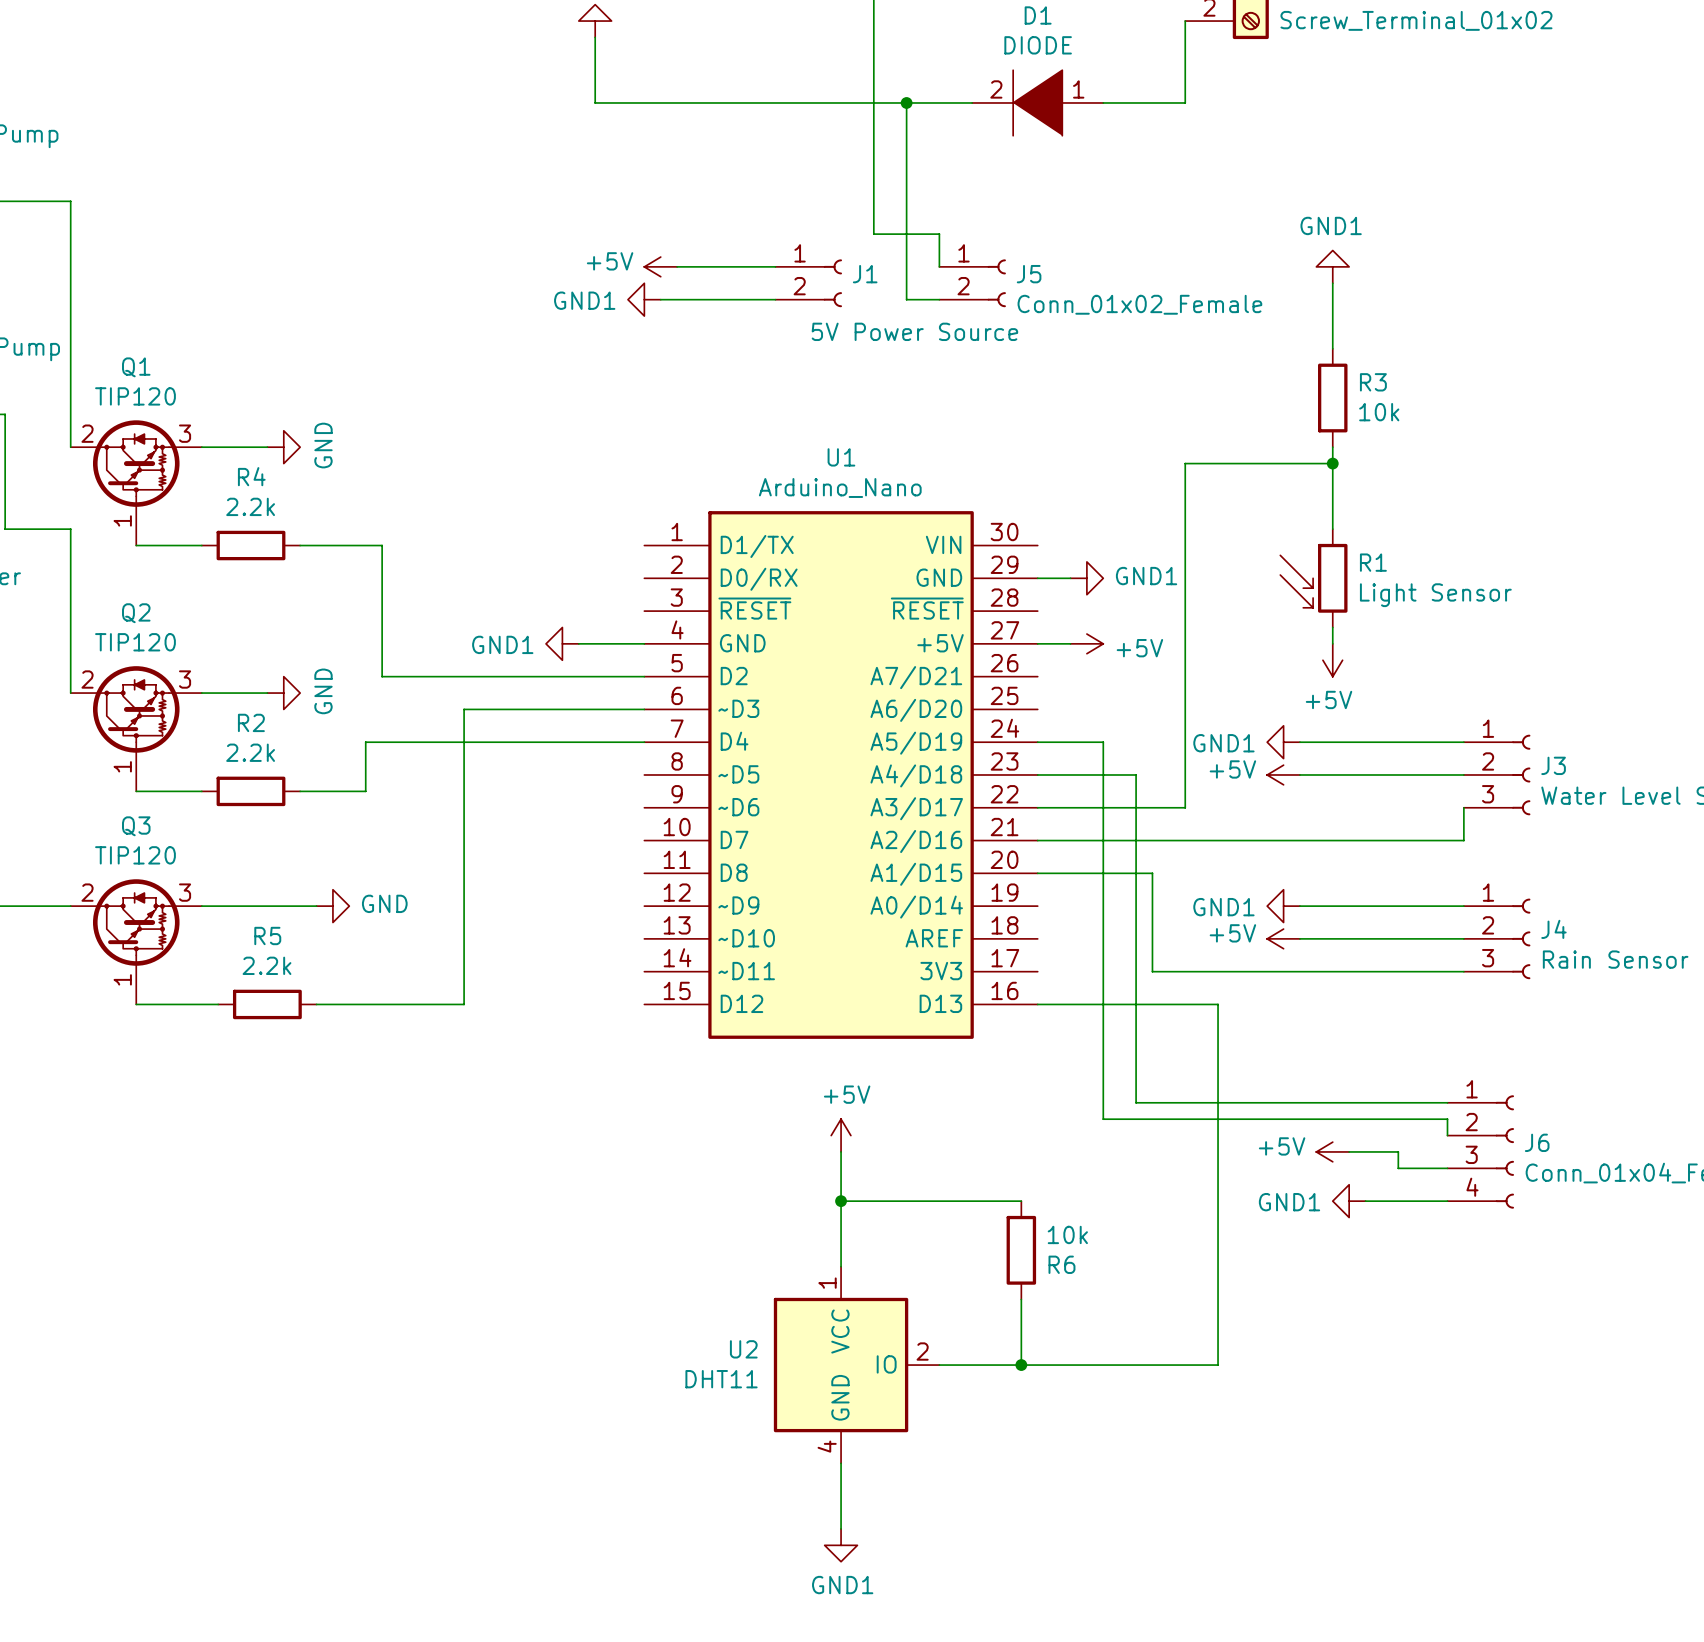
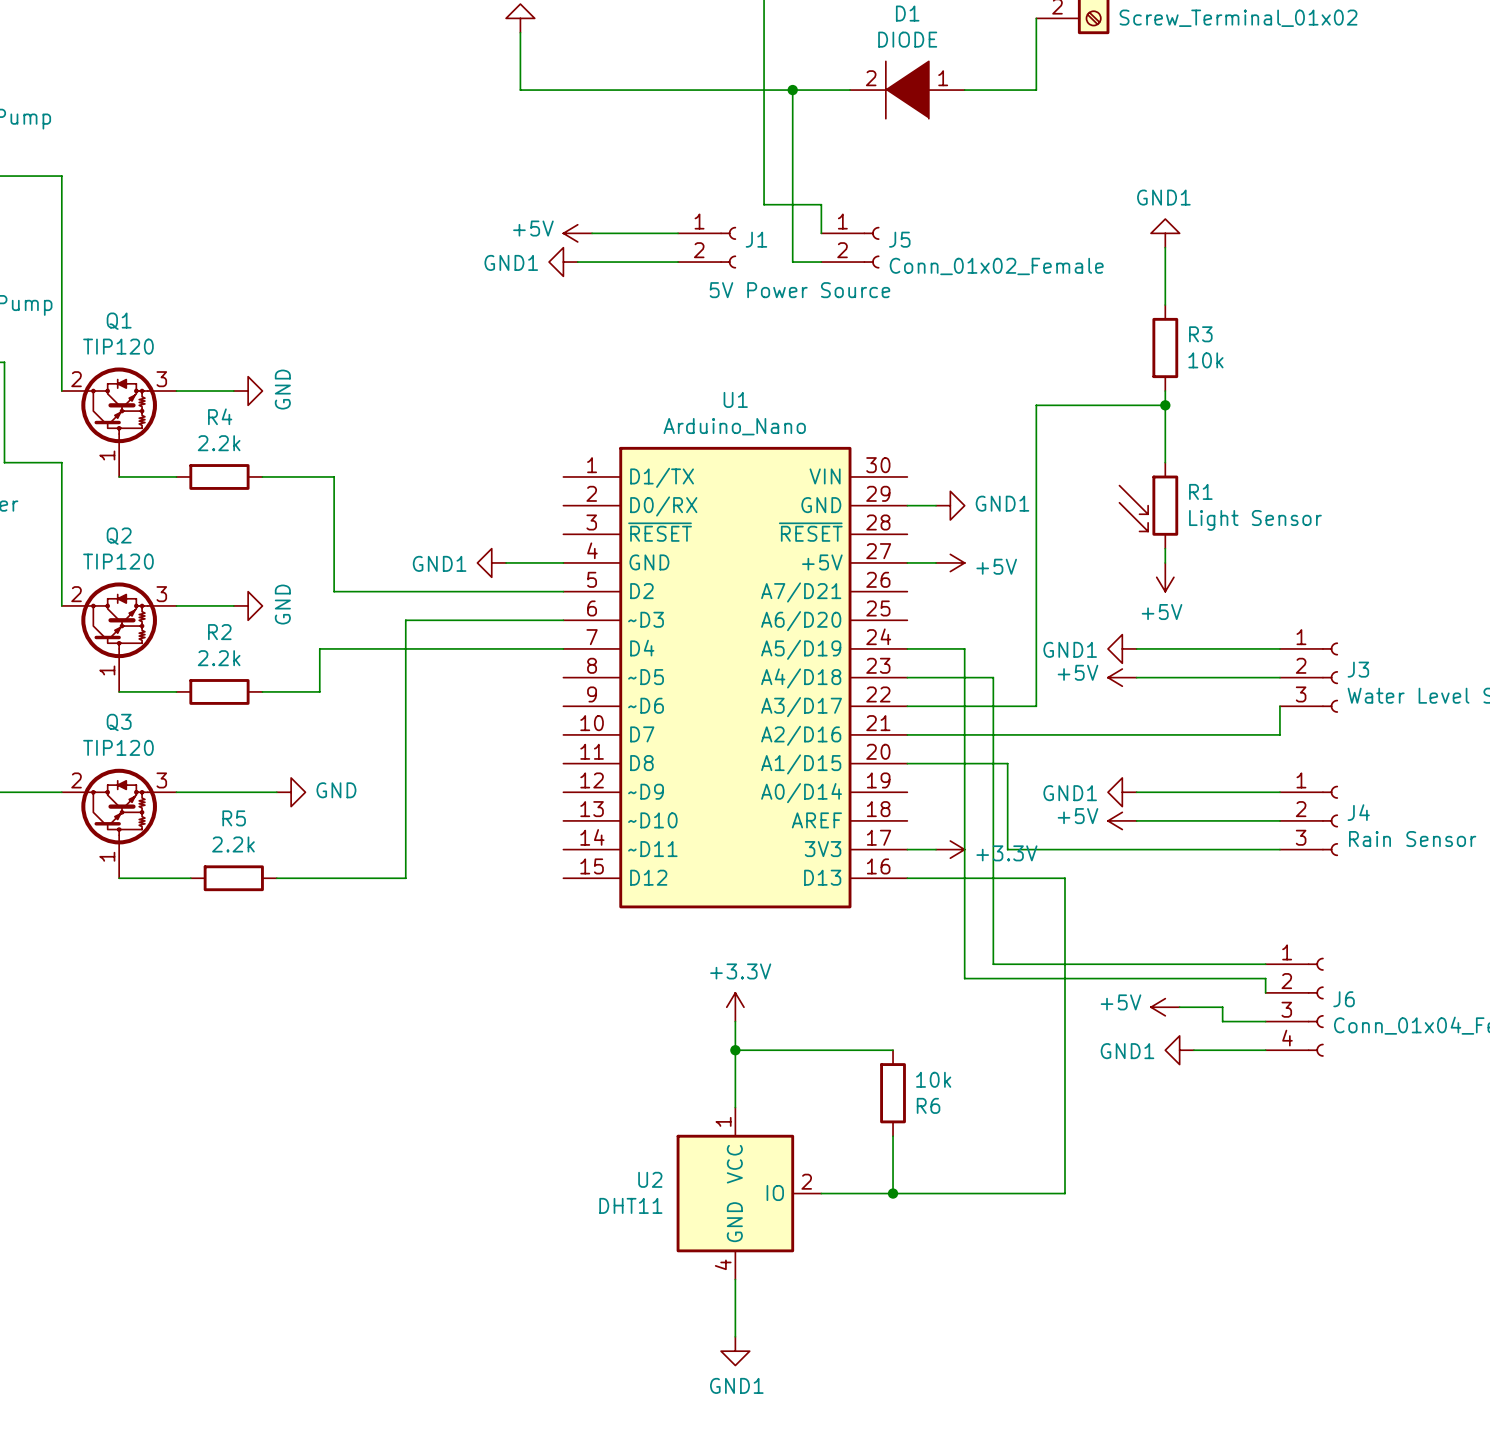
wire: none -> (907, 849) (936, 849)
power symbol: none -> +3.3V (950, 849)
power symbol: +5V (841, 1135) -> none
power symbol: none -> +3.3V (735, 1007)

